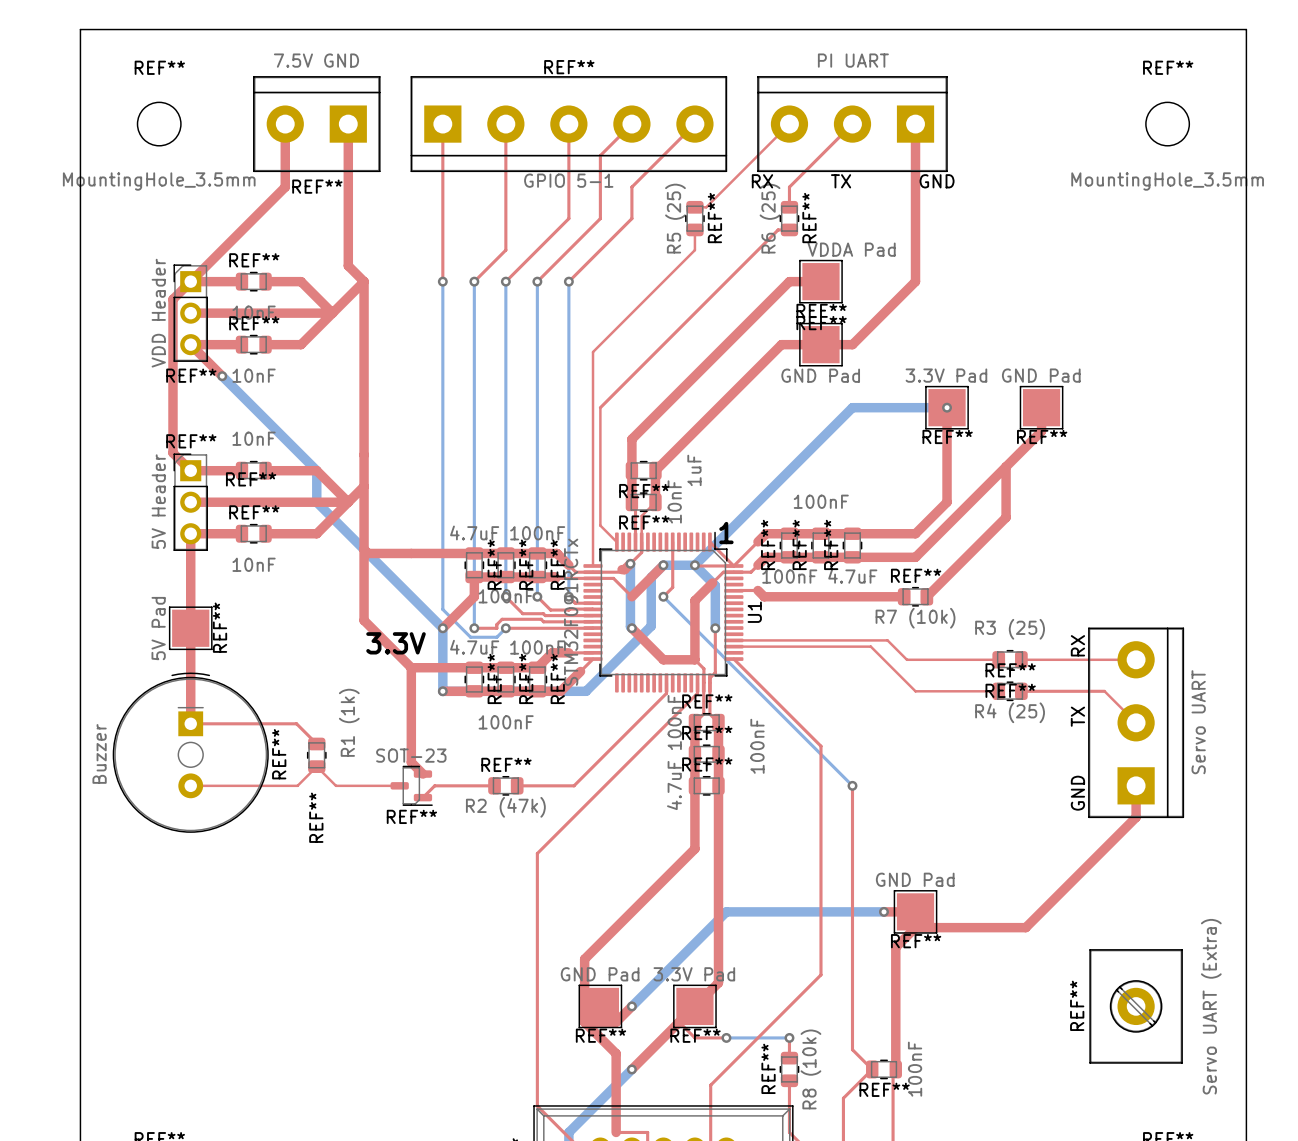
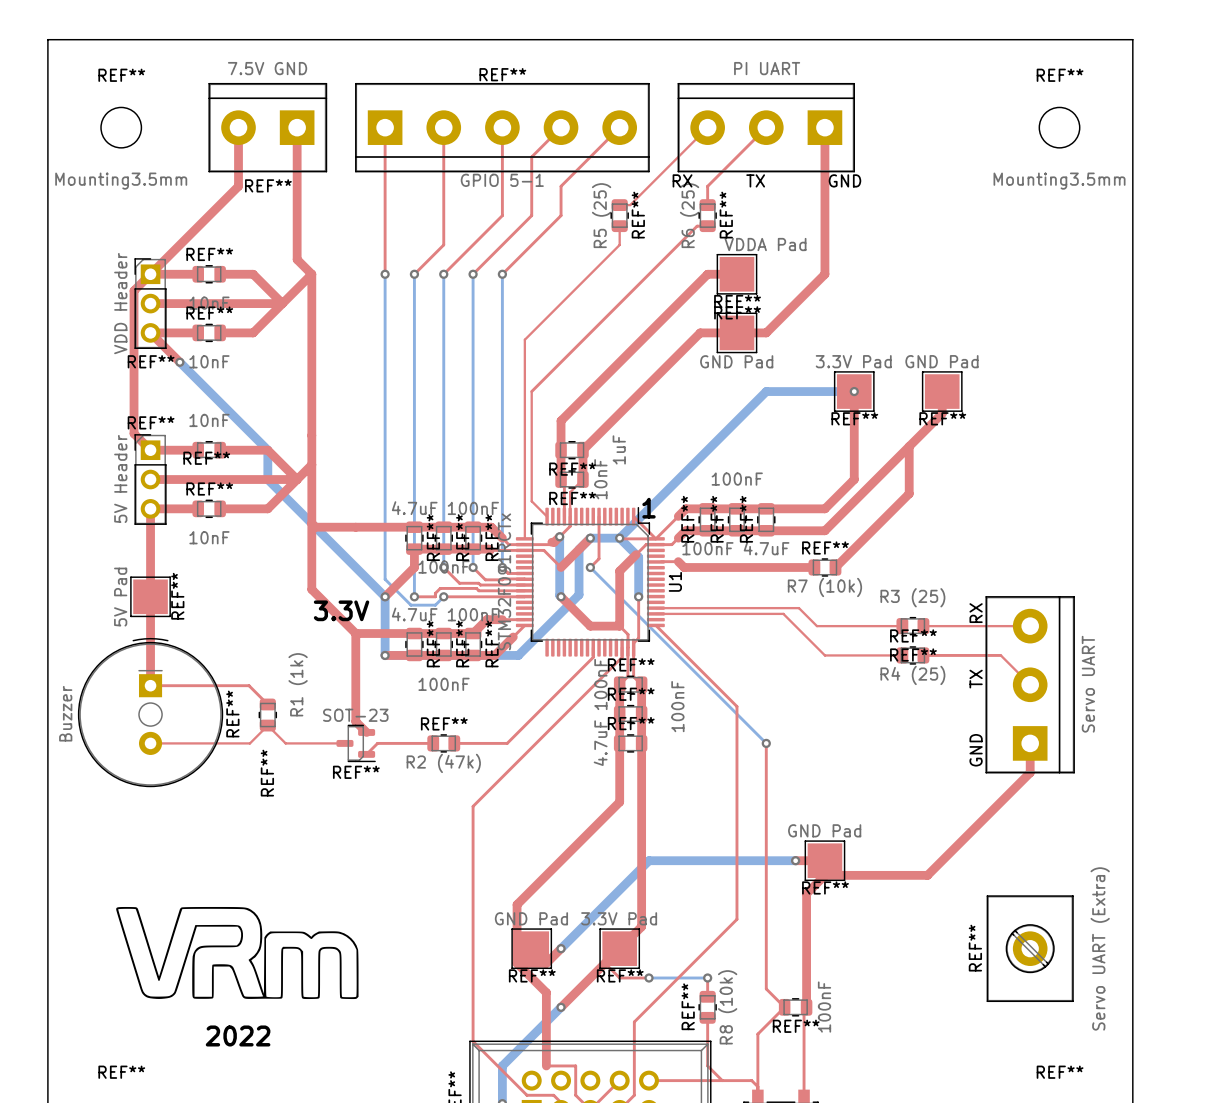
REF** value: MountingHole_3.5mm (159, 181) -> Mounting3.5mm (121, 181)
REF** value: MountingHole_3.5mm (1167, 181) -> Mounting3.5mm (1059, 181)
2022: none -> (237, 953)

